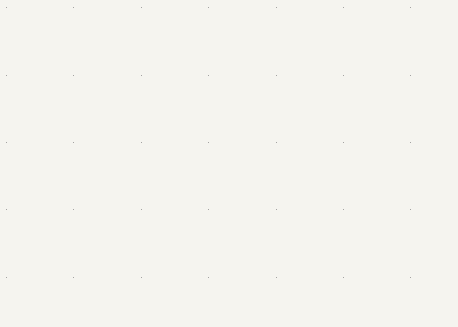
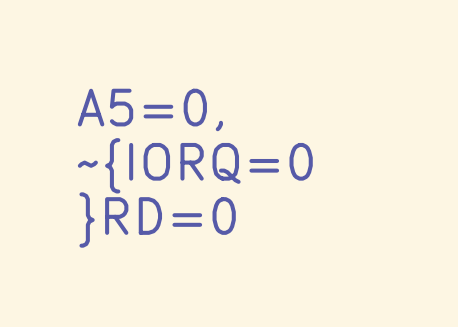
text: none -> A5=0, (150, 109)
text: none -> ~{IORQ=0 (195, 165)
text: none -> }RD=0 (157, 220)

